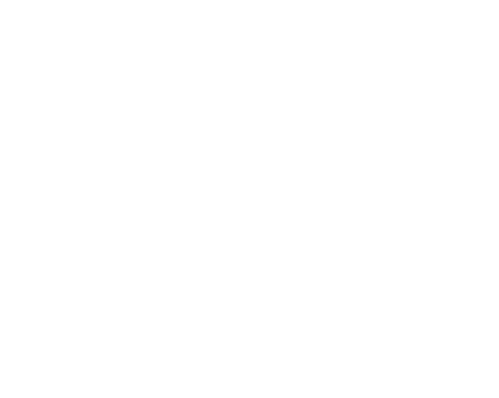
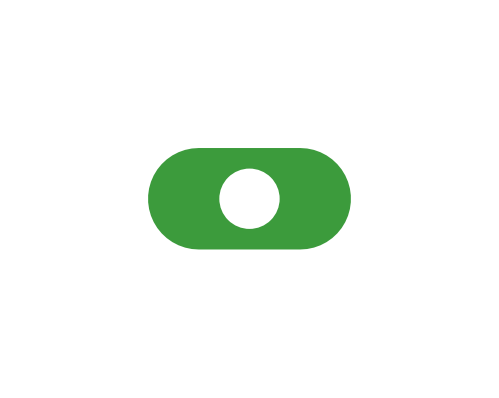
part: none -> (249, 198)

